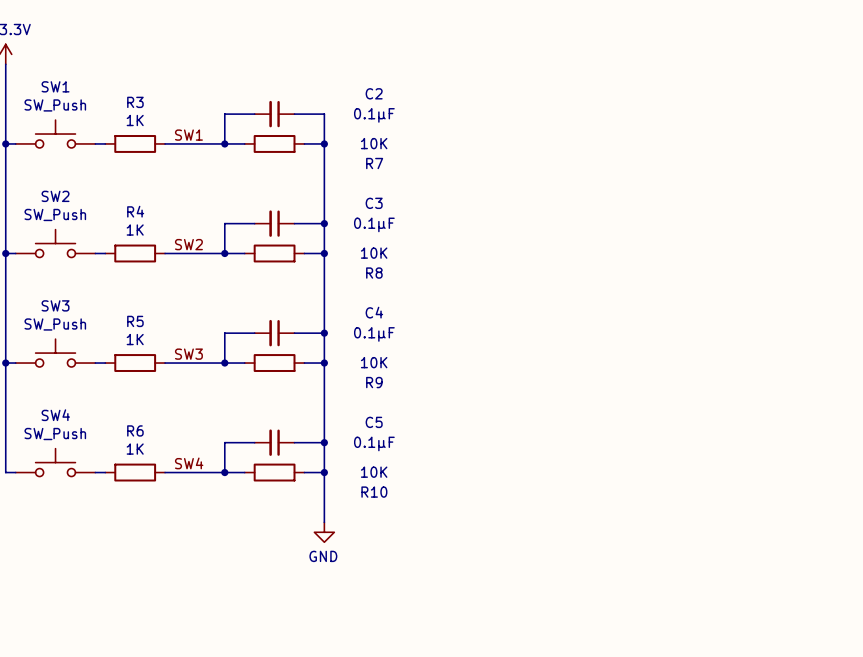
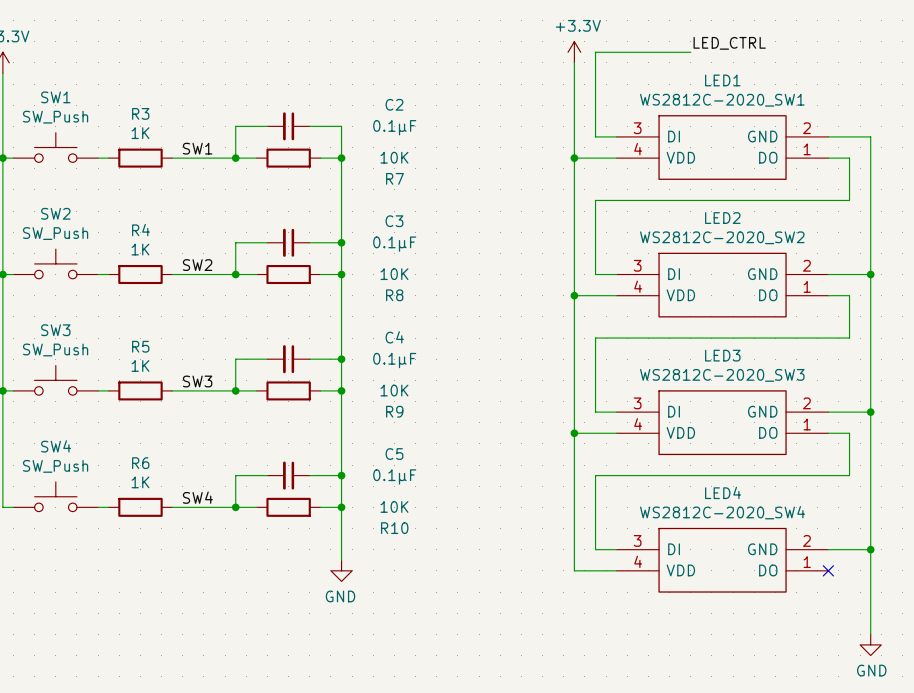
label: none -> LED_CTRL (729, 43)
power symbol: none -> +3.3V (574, 52)
wire: none -> (690, 52) (595, 52) (595, 136) (616, 136)
wire: none -> (574, 62) (574, 570) (616, 570)
wire: none -> (828, 136) (870, 136) (870, 634)
LED1: none -> WS2812C-2020_SW1 (722, 147)
wire: none -> (574, 158) (616, 158)
junction: none -> (574, 158)
wire: none -> (828, 158) (849, 158) (849, 200) (595, 200) (595, 274) (616, 274)
wire: none -> (828, 274) (870, 274)
junction: none -> (870, 274)
LED2: none -> WS2812C-2020_SW2 (722, 285)
wire: none -> (574, 295) (616, 295)
junction: none -> (574, 295)
wire: none -> (828, 295) (849, 295) (849, 338) (595, 338) (595, 412) (616, 412)
wire: none -> (828, 412) (870, 412)
junction: none -> (870, 412)
LED3: none -> WS2812C-2020_SW3 (722, 422)
wire: none -> (574, 433) (616, 433)
junction: none -> (574, 433)
wire: none -> (828, 433) (849, 433) (849, 475) (595, 475) (595, 549) (616, 549)
wire: none -> (828, 549) (870, 549)
junction: none -> (870, 549)
LED4: none -> WS2812C-2020_SW4 (722, 560)
no-connect mark: none -> (828, 570)
power symbol: none -> GND (870, 644)

